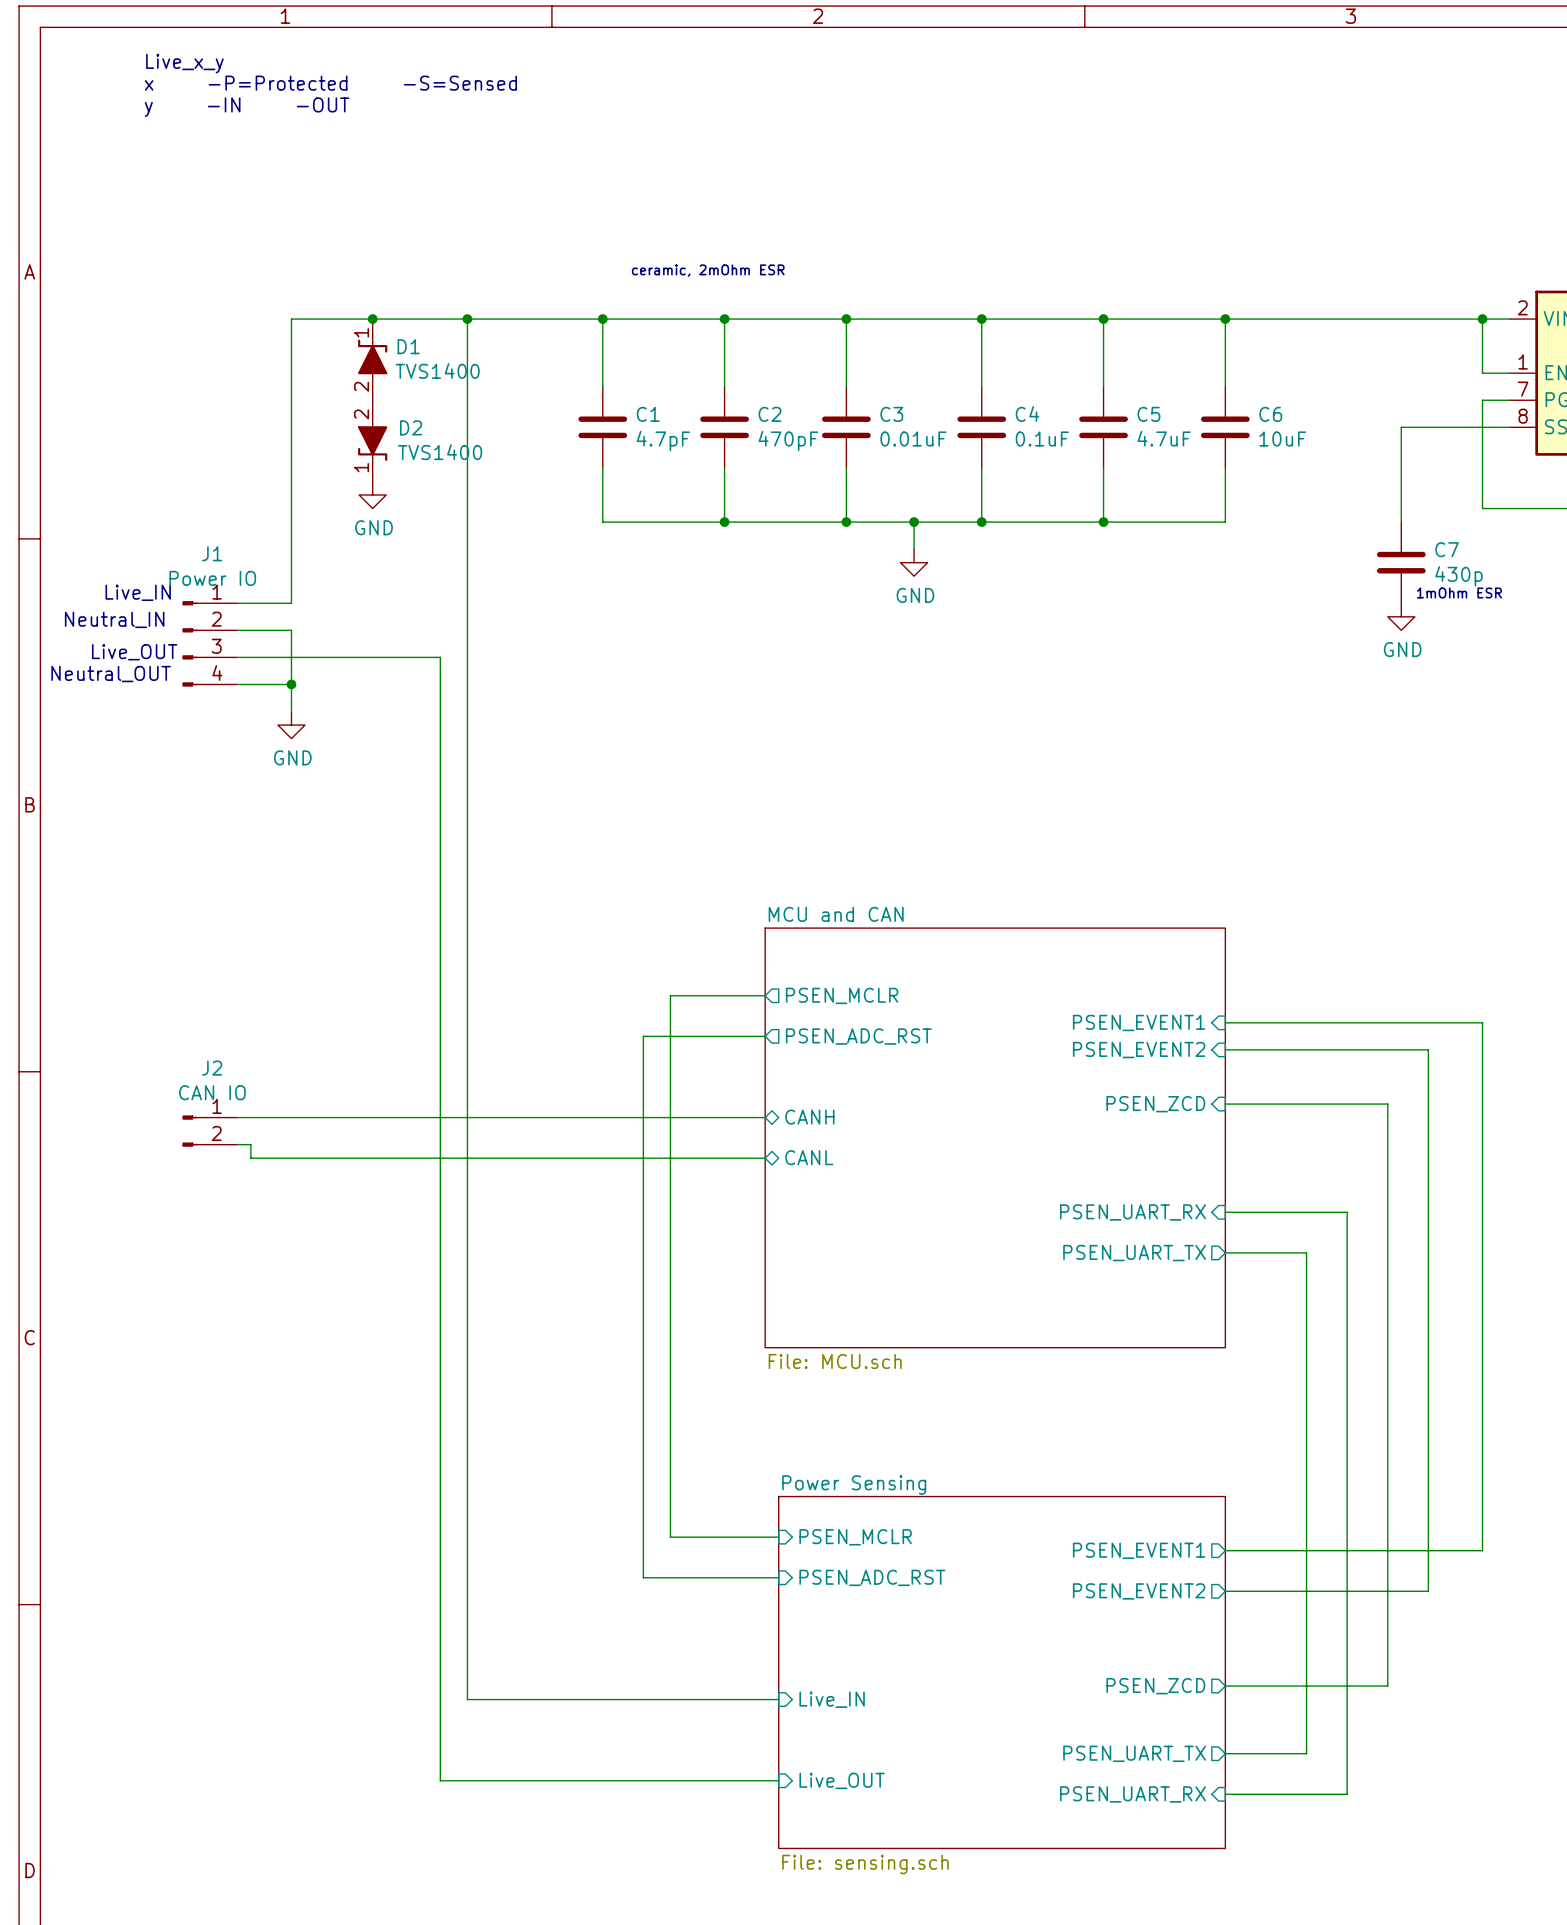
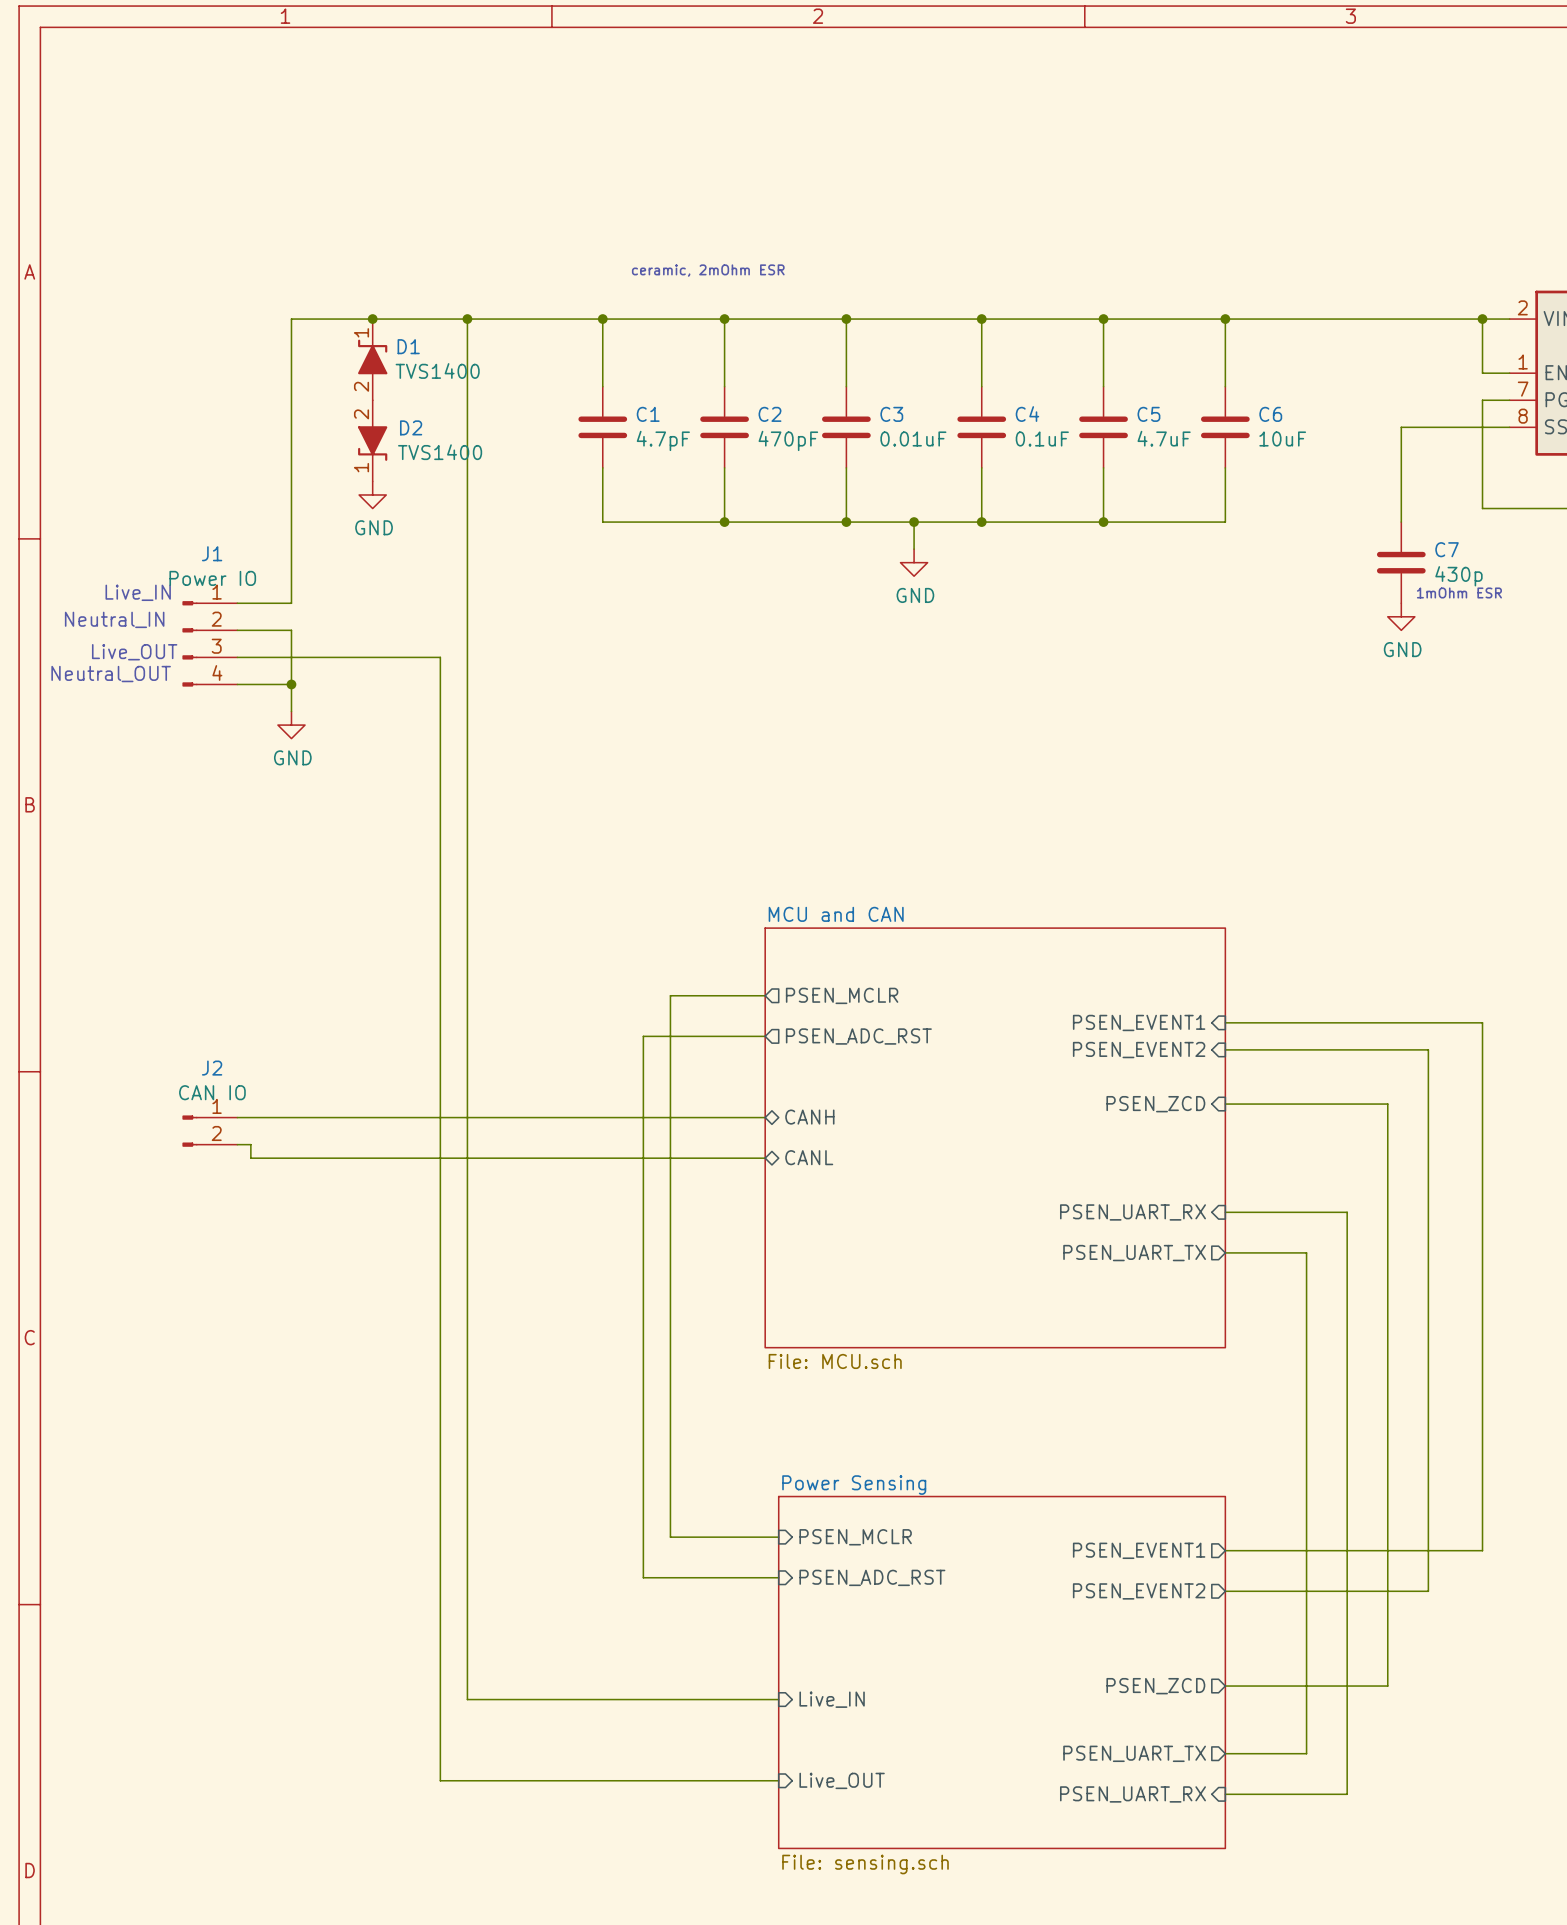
text: Live_x_y (184, 63) -> none
text: x -P=Protected -S=Sensed (330, 83) -> none
text: y -IN -OUT (247, 107) -> none

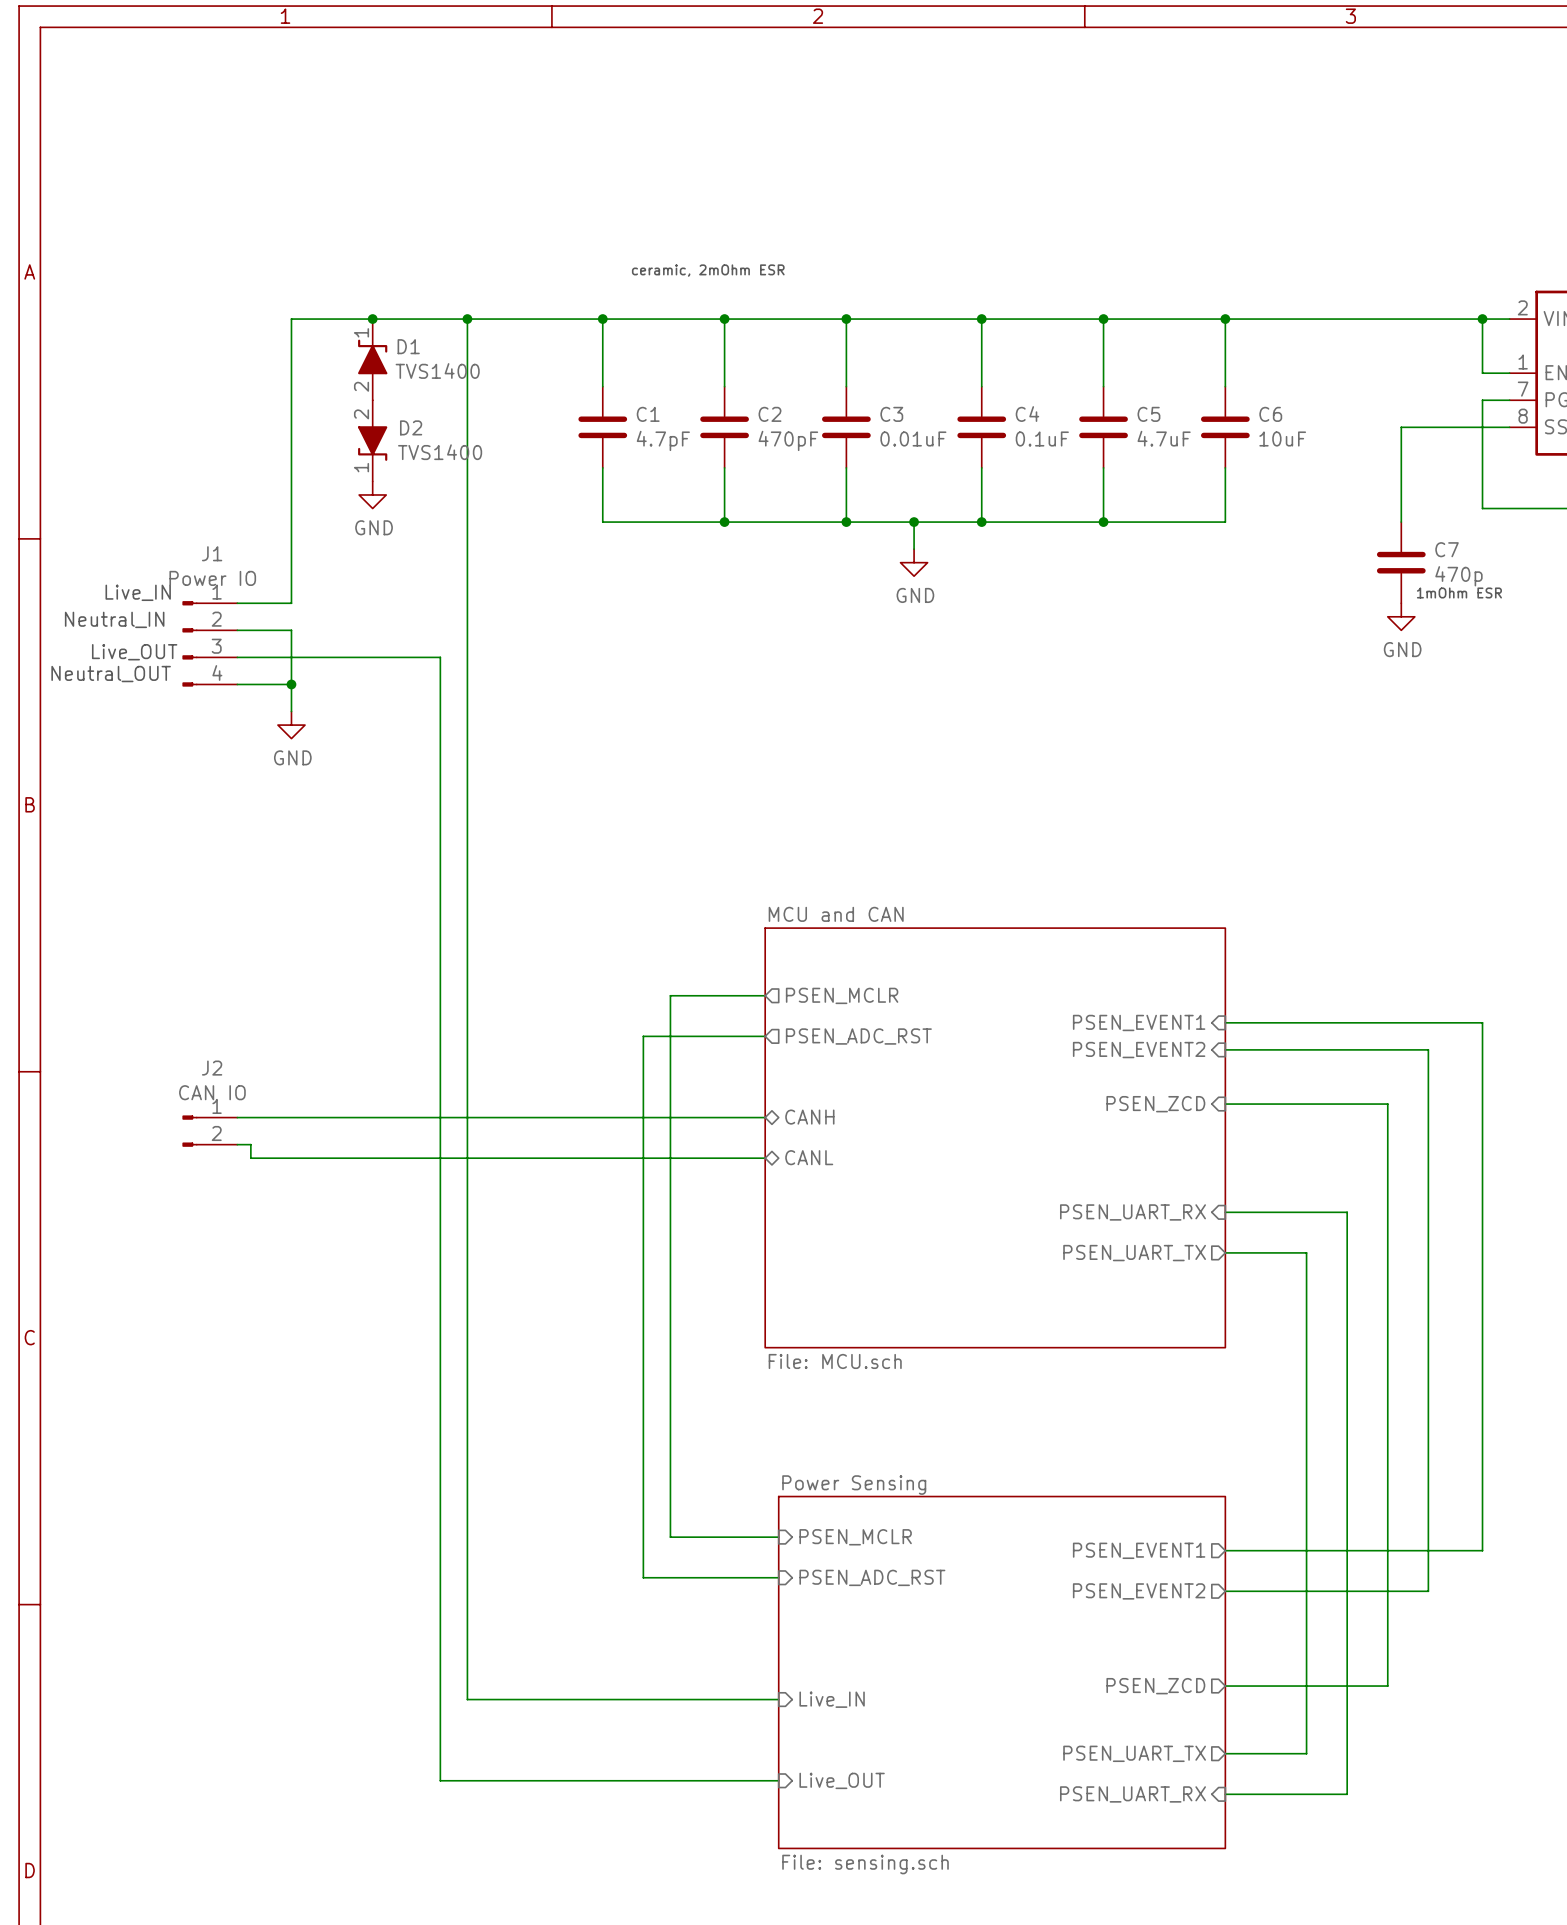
C7 value: 430p (1458, 576) -> 470p (1458, 576)

